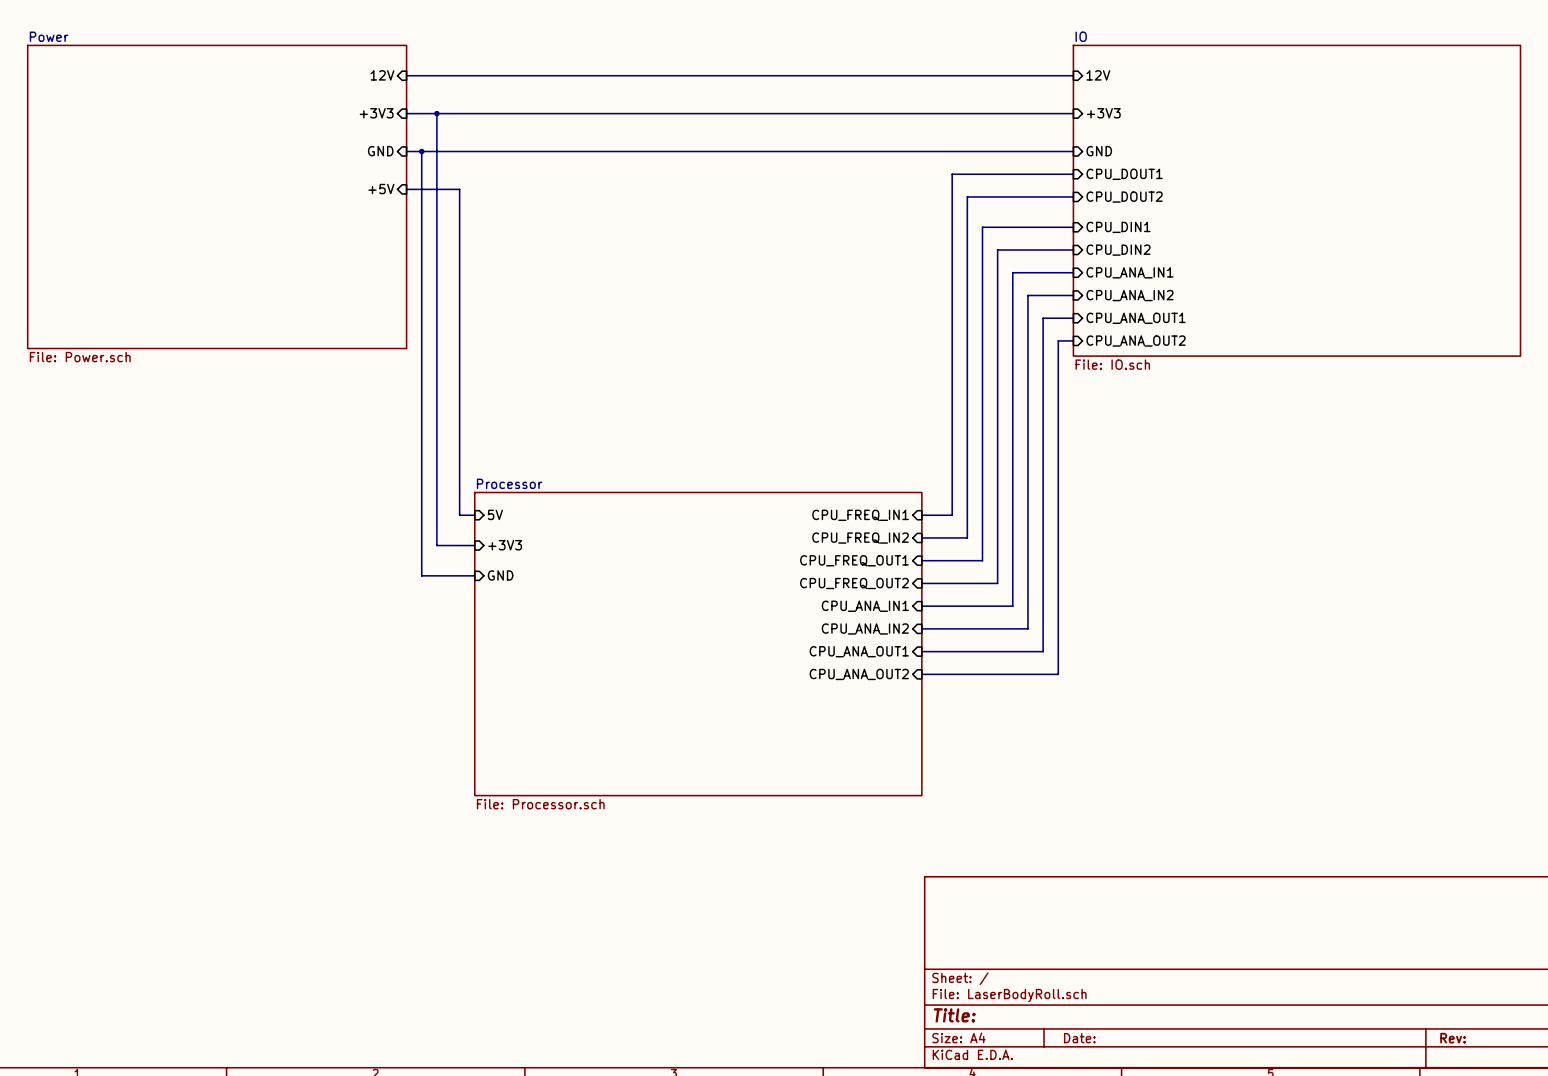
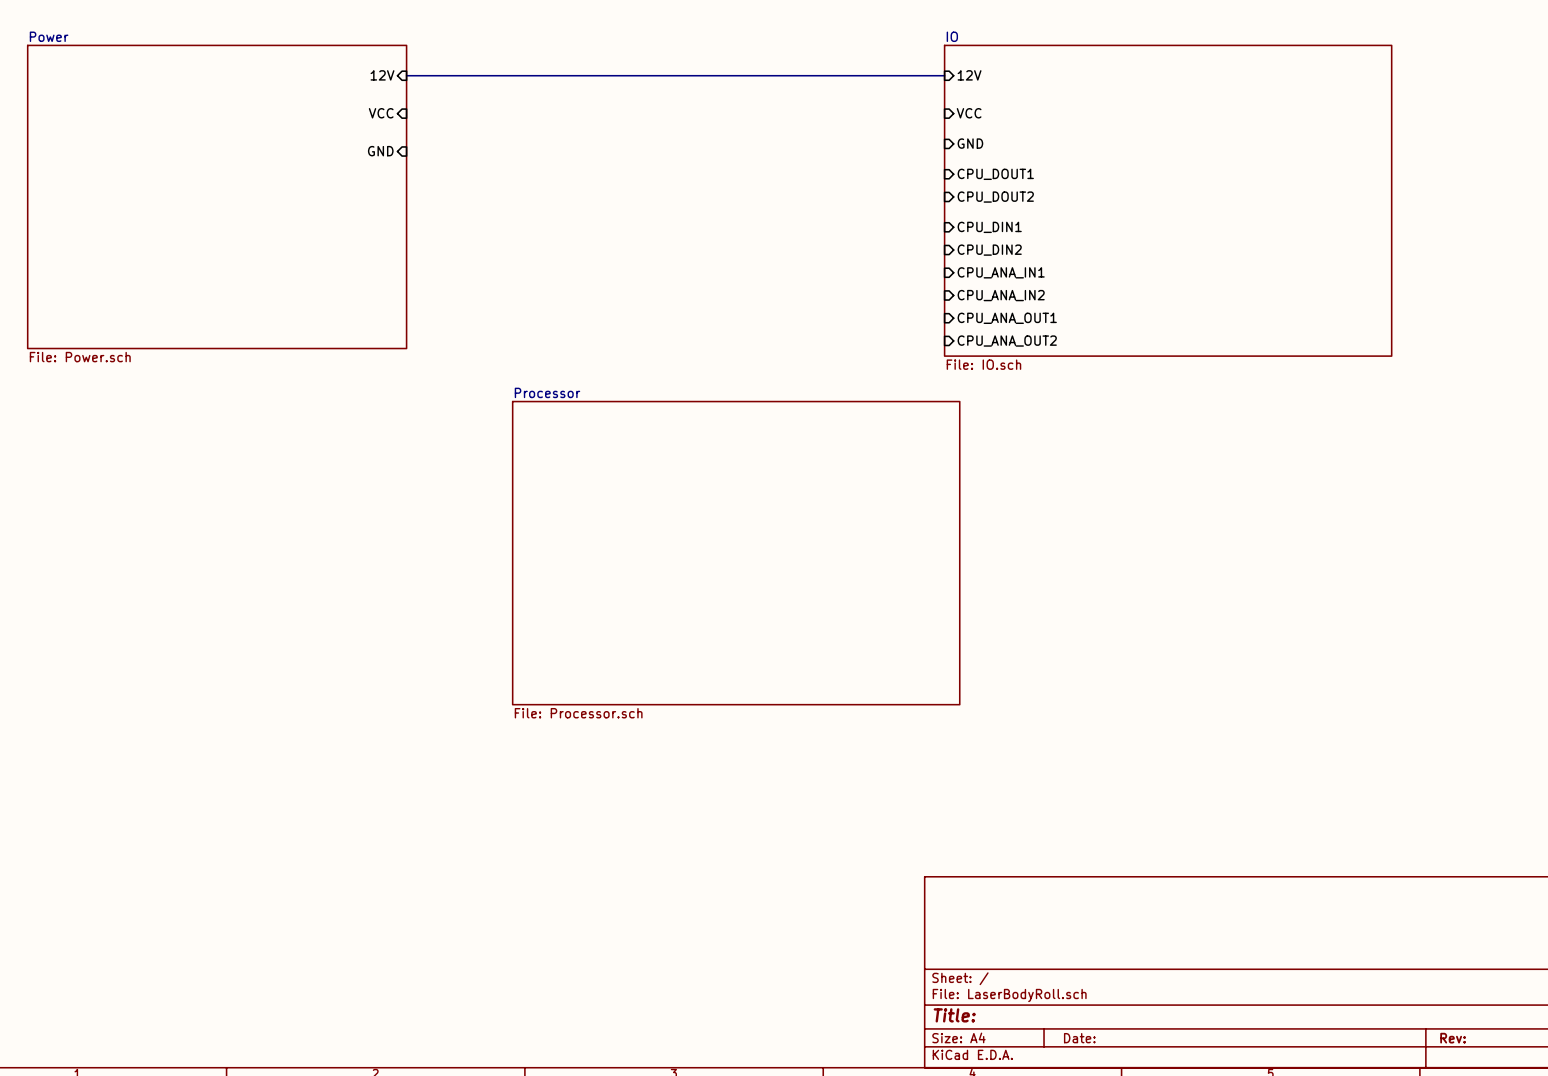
wire: (944, 75) (1073, 75) -> none
sheet pin position: 12V (1098, 75) -> 12V (969, 75)
sheet pin: +3V3 (376, 113) -> VCC (381, 113)
wire: (406, 113) (1073, 113) -> none
wire: (436, 113) (436, 545) (474, 545) -> none
junction: (436, 113) -> none
sheet pin: none -> VCC (969, 113)
sheet pin: +3V3 (1103, 113) -> none
wire: (406, 151) (1073, 151) -> none
wire: (421, 151) (421, 575) (474, 575) -> none
junction: (421, 151) -> none
sheet pin position: GND (1099, 151) -> GND (970, 143)
wire: (1073, 174) (952, 174) (952, 515) (921, 515) -> none
sheet pin position: CPU_DOUT1 (1124, 174) -> CPU_DOUT1 (995, 174)
sheet pin: +5V (381, 189) -> none
wire: (406, 189) (459, 189) (459, 515) (474, 515) -> none
wire: (1073, 196) (967, 196) (967, 537) (921, 537) -> none
sheet pin position: CPU_DOUT2 (1124, 197) -> CPU_DOUT2 (995, 197)
sheet IO position: (1296, 200) -> (1168, 200)
wire: (1073, 227) (982, 227) (982, 560) (921, 560) -> none
sheet pin position: CPU_DIN1 (1118, 227) -> CPU_DIN1 (989, 227)
wire: (1073, 250) (997, 250) (997, 583) (921, 583) -> none
sheet pin position: CPU_DIN2 (1118, 250) -> CPU_DIN2 (989, 250)
wire: (1073, 272) (1012, 272) (1012, 606) (921, 606) -> none
sheet pin position: CPU_ANA_IN1 (1129, 272) -> CPU_ANA_IN1 (1001, 272)
wire: (1073, 295) (1027, 295) (1027, 628) (921, 628) -> none
sheet pin position: CPU_ANA_IN2 (1129, 295) -> CPU_ANA_IN2 (1001, 295)
wire: (1073, 318) (1043, 318) (1043, 651) (921, 651) -> none
sheet pin position: CPU_ANA_OUT1 (1136, 318) -> CPU_ANA_OUT1 (1007, 318)
wire: (1073, 340) (1058, 340) (1058, 674) (921, 674) -> none
sheet pin position: CPU_ANA_OUT2 (1136, 341) -> CPU_ANA_OUT2 (1007, 341)
sheet pin: 5V (495, 514) -> none
sheet pin: CPU_FREQ_IN1 (860, 515) -> none
sheet pin: CPU_FREQ_IN2 (860, 538) -> none
sheet pin: +3V3 (505, 545) -> none
sheet pin: CPU_FREQ_OUT1 (854, 560) -> none
sheet pin: GND (500, 575) -> none
sheet pin: CPU_FREQ_OUT2 (854, 583) -> none
sheet pin: CPU_ANA_IN1 (865, 606) -> none
sheet pin: CPU_ANA_IN2 (865, 628) -> none
sheet Processor position: (698, 644) -> (736, 553)
sheet pin: CPU_ANA_OUT1 (859, 651) -> none
sheet pin: CPU_ANA_OUT2 (859, 674) -> none

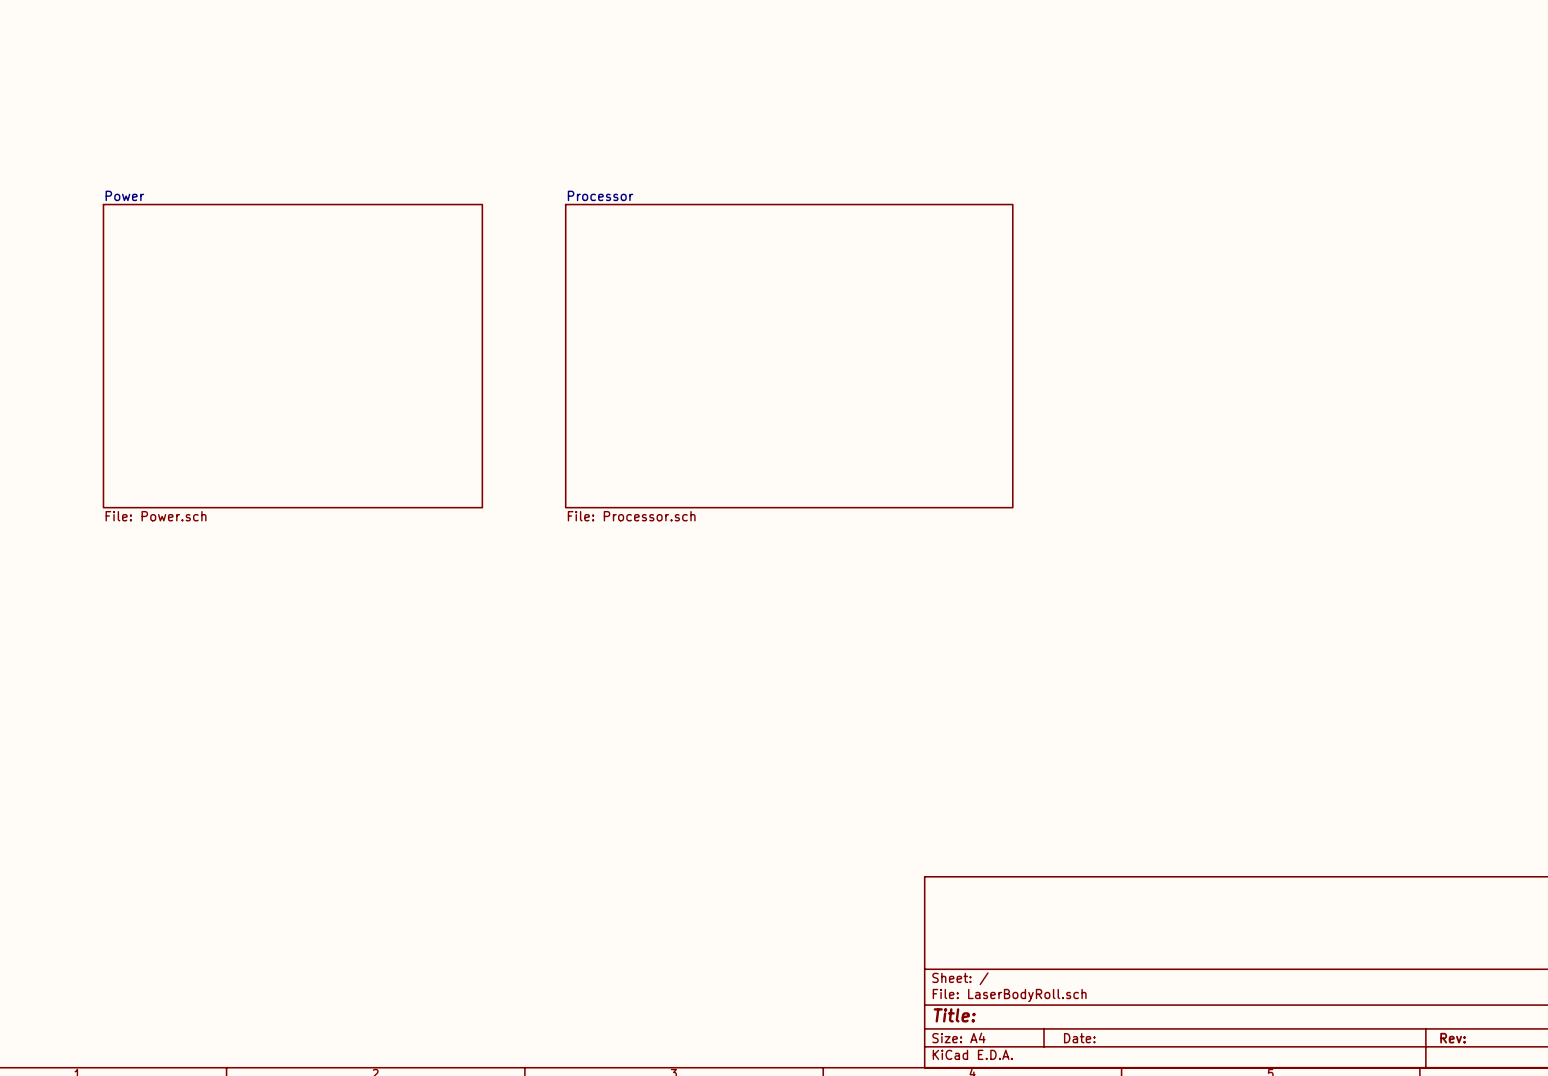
sheet pin: 12V (382, 75) -> none
wire: (406, 75) (944, 75) -> none
sheet pin: 12V (969, 75) -> none
sheet pin: VCC (381, 113) -> none
sheet pin: VCC (969, 113) -> none
sheet pin: GND (970, 143) -> none
sheet pin: GND (380, 151) -> none
sheet pin: CPU_DOUT1 (995, 174) -> none
sheet Power: File: Power.sch (217, 196) -> none
sheet pin: CPU_DOUT2 (995, 197) -> none
sheet IO: File: IO.sch (1168, 200) -> none
sheet pin: CPU_DIN1 (989, 227) -> none
sheet pin: CPU_DIN2 (989, 250) -> none
sheet pin: CPU_ANA_IN1 (1001, 272) -> none
sheet pin: CPU_ANA_IN2 (1001, 295) -> none
sheet pin: CPU_ANA_OUT1 (1007, 318) -> none
sheet pin: CPU_ANA_OUT2 (1007, 341) -> none
sheet Power: none -> File: Power.sch (292, 356)
sheet Processor: none -> File: Processor.sch (789, 356)
sheet Processor: File: Processor.sch (736, 553) -> none

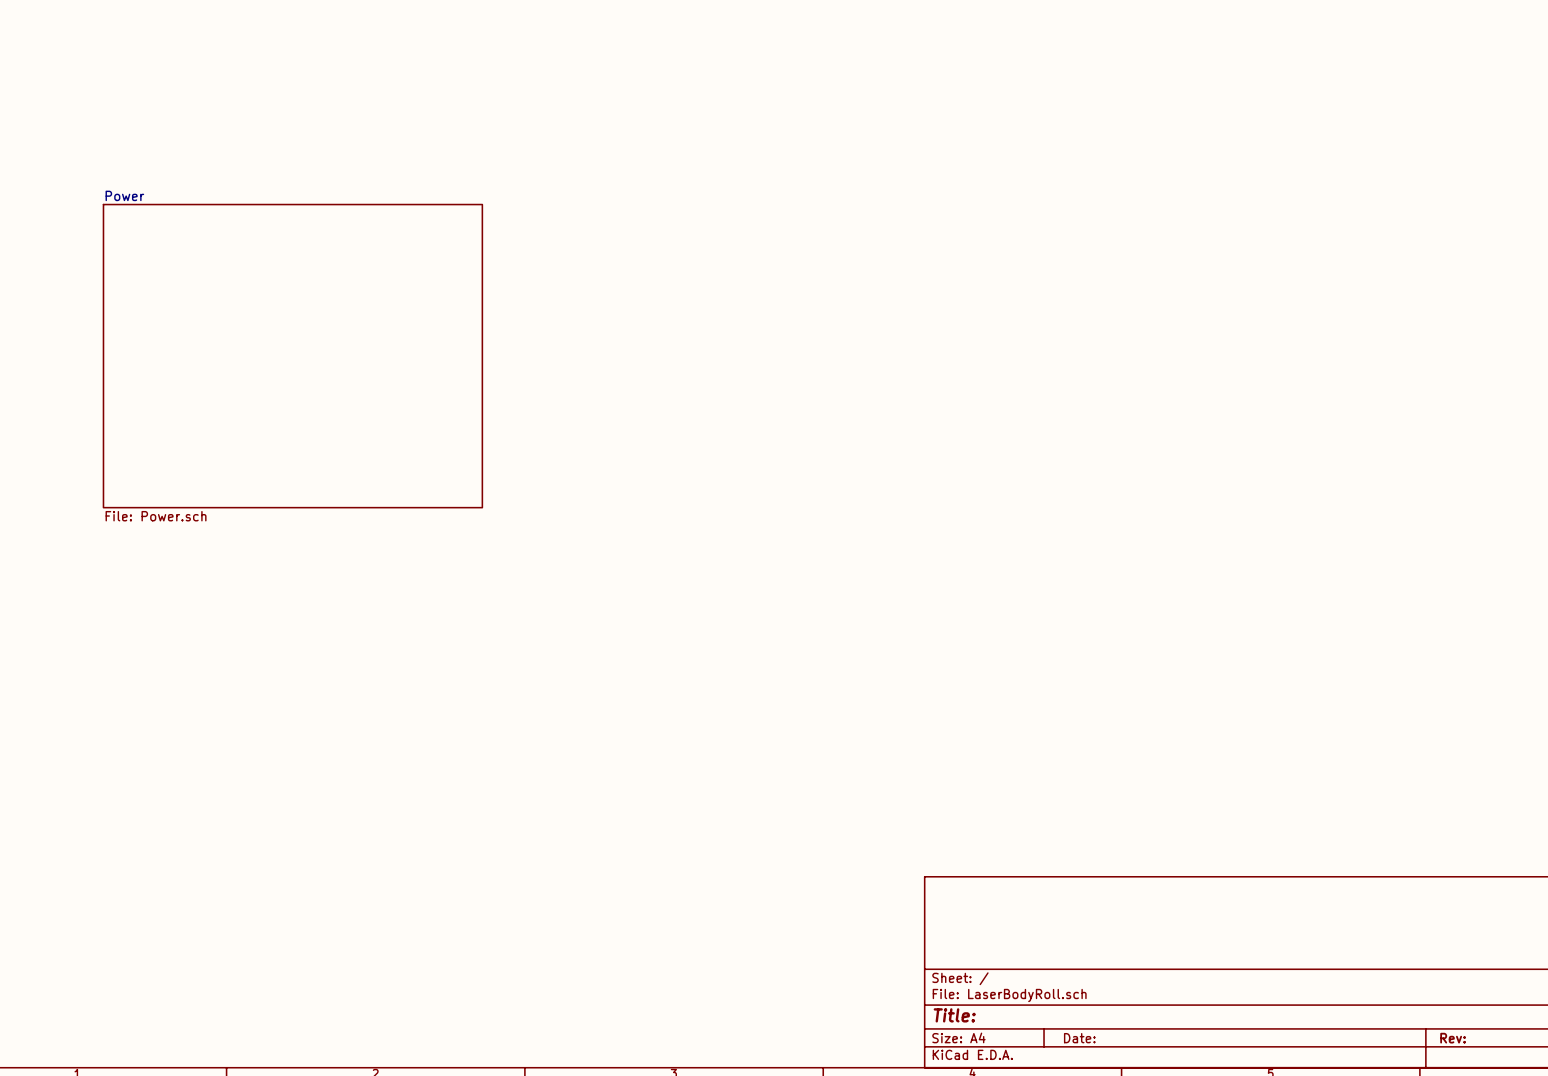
sheet Processor: File: Processor.sch (789, 356) -> none

